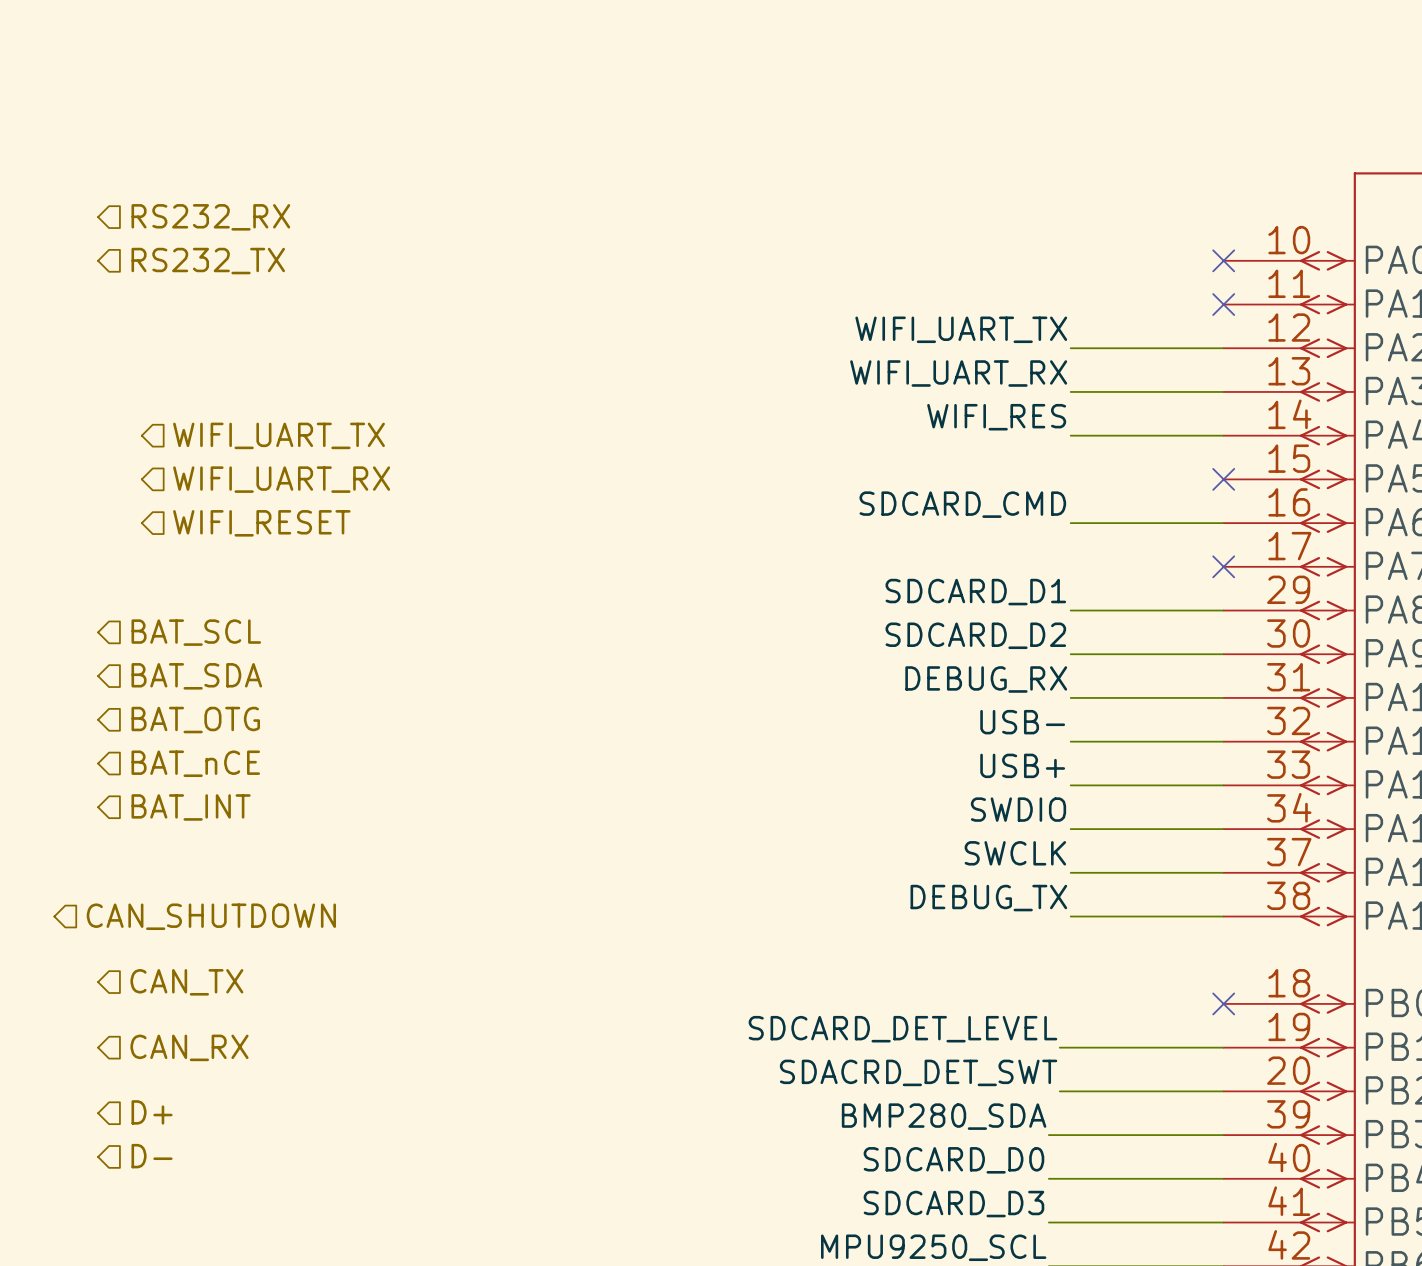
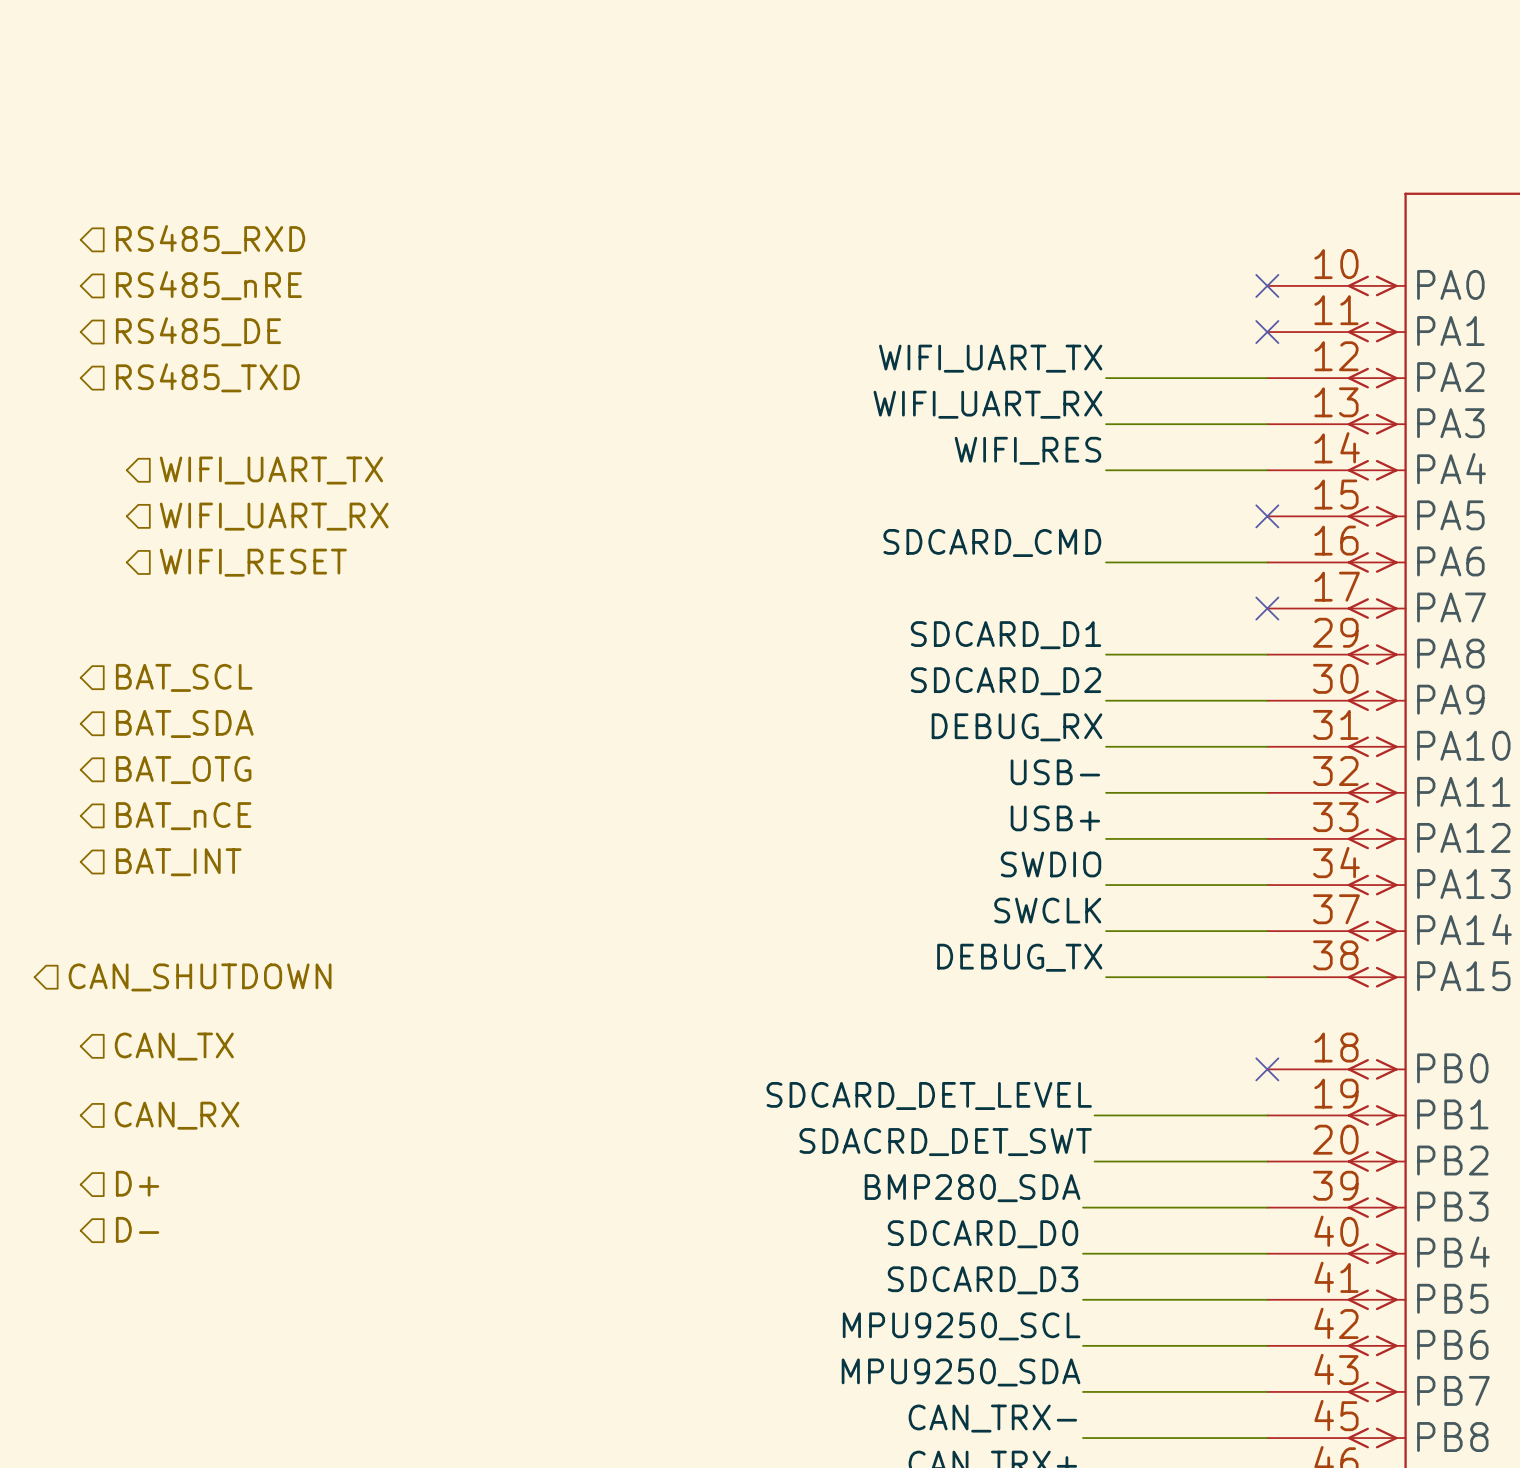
hierarchical label: RS232_RX (210, 217) -> RS485_RXD (210, 239)
hierarchical label: RS232_TX (208, 261) -> RS485_nRE (208, 285)
hierarchical label: none -> RS485_DE (198, 331)
hierarchical label: none -> RS485_TXD (207, 377)

